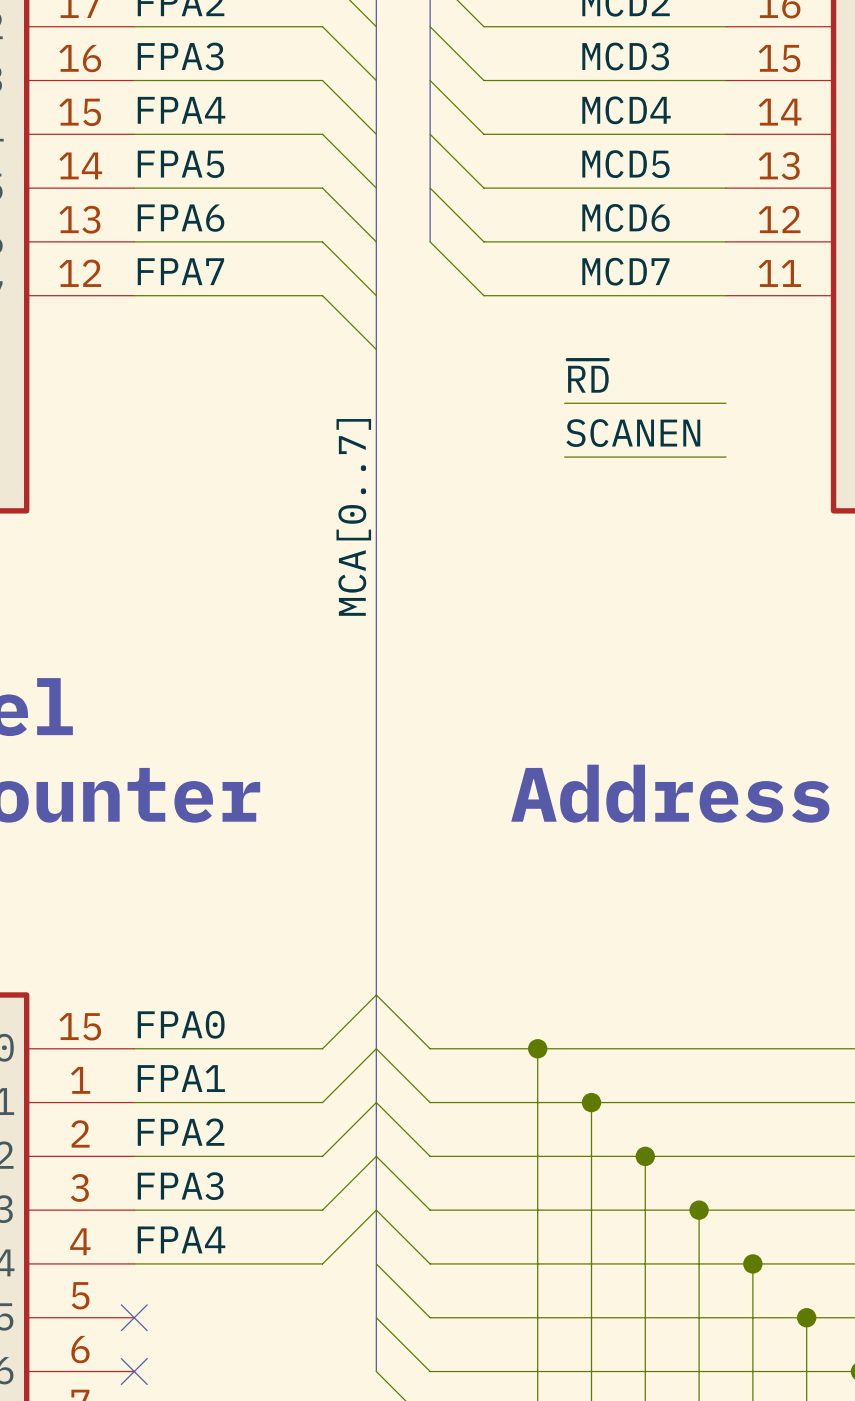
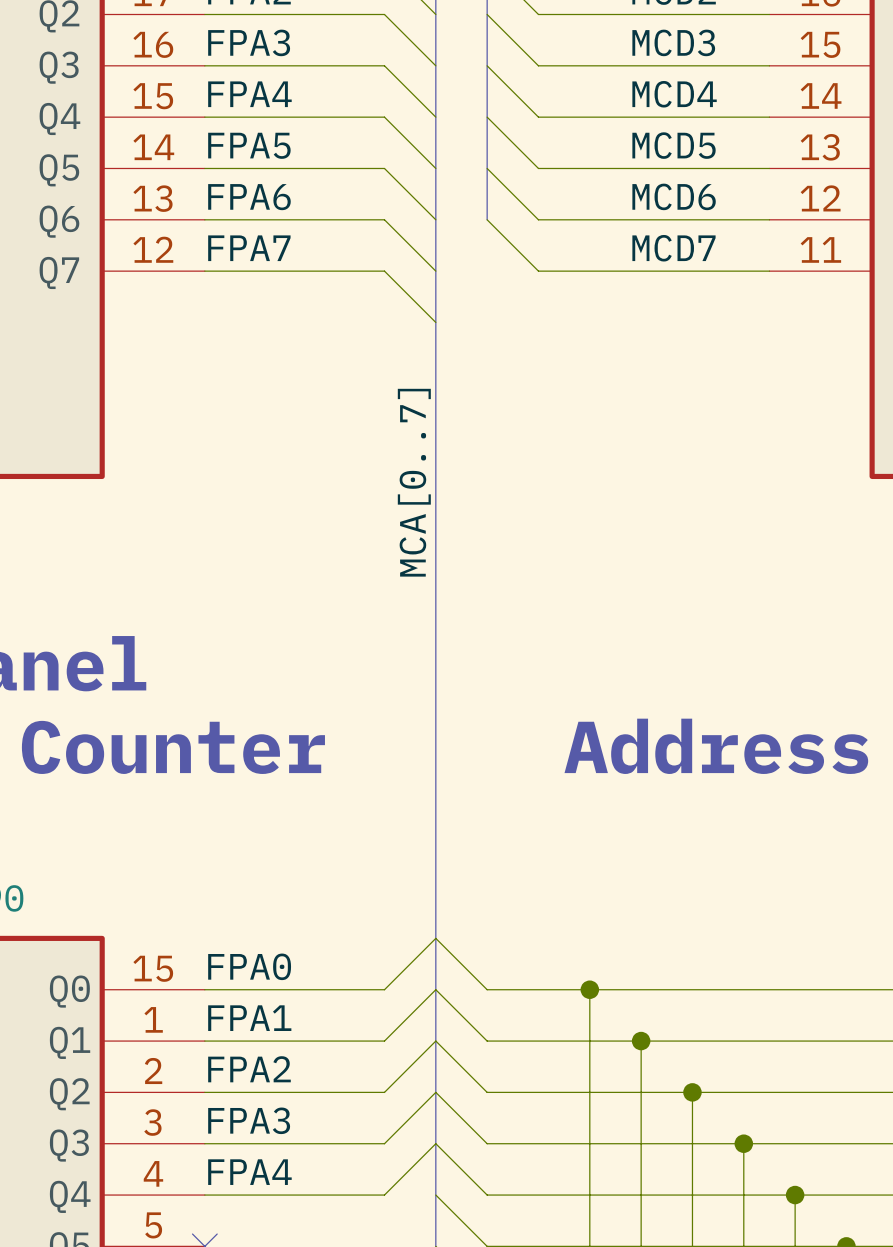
label: ~{RD} (587, 376) -> none
wire: (564, 403) (725, 403) -> none
label: SCANEN (633, 433) -> none
wire: (564, 457) (725, 457) -> none

